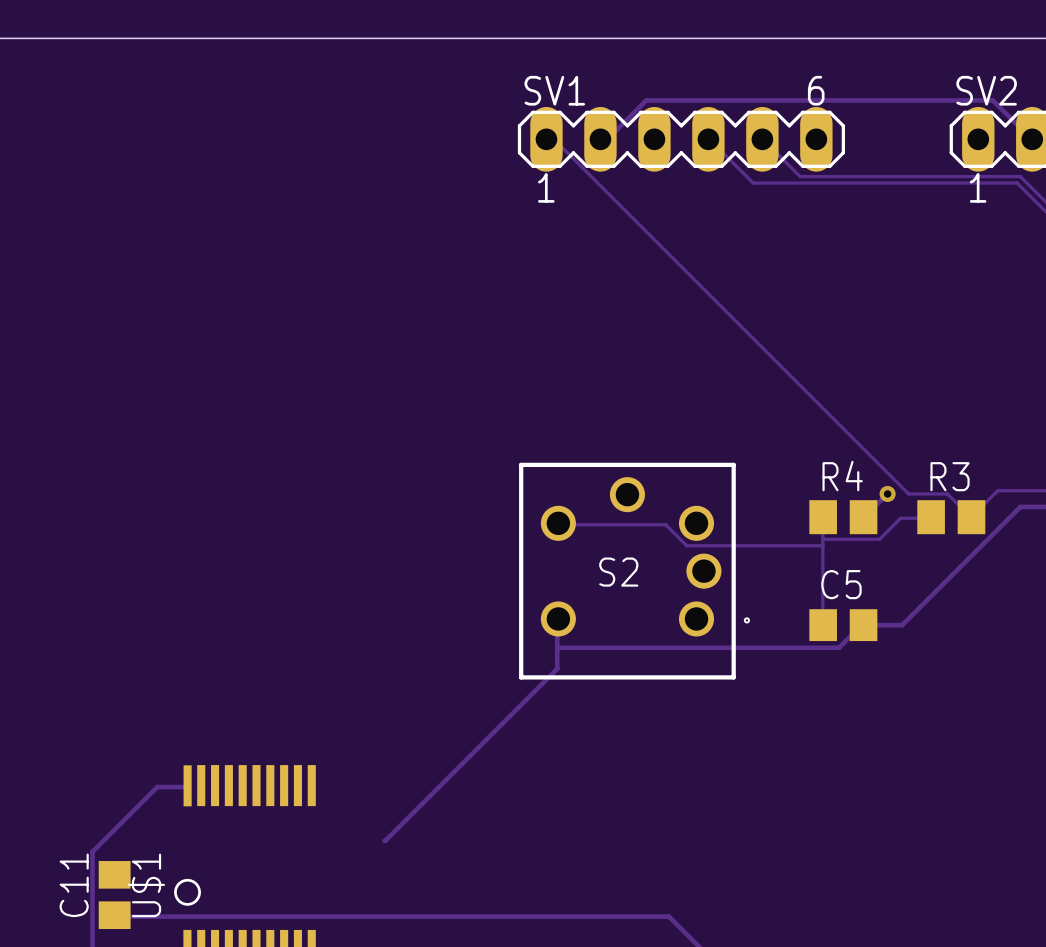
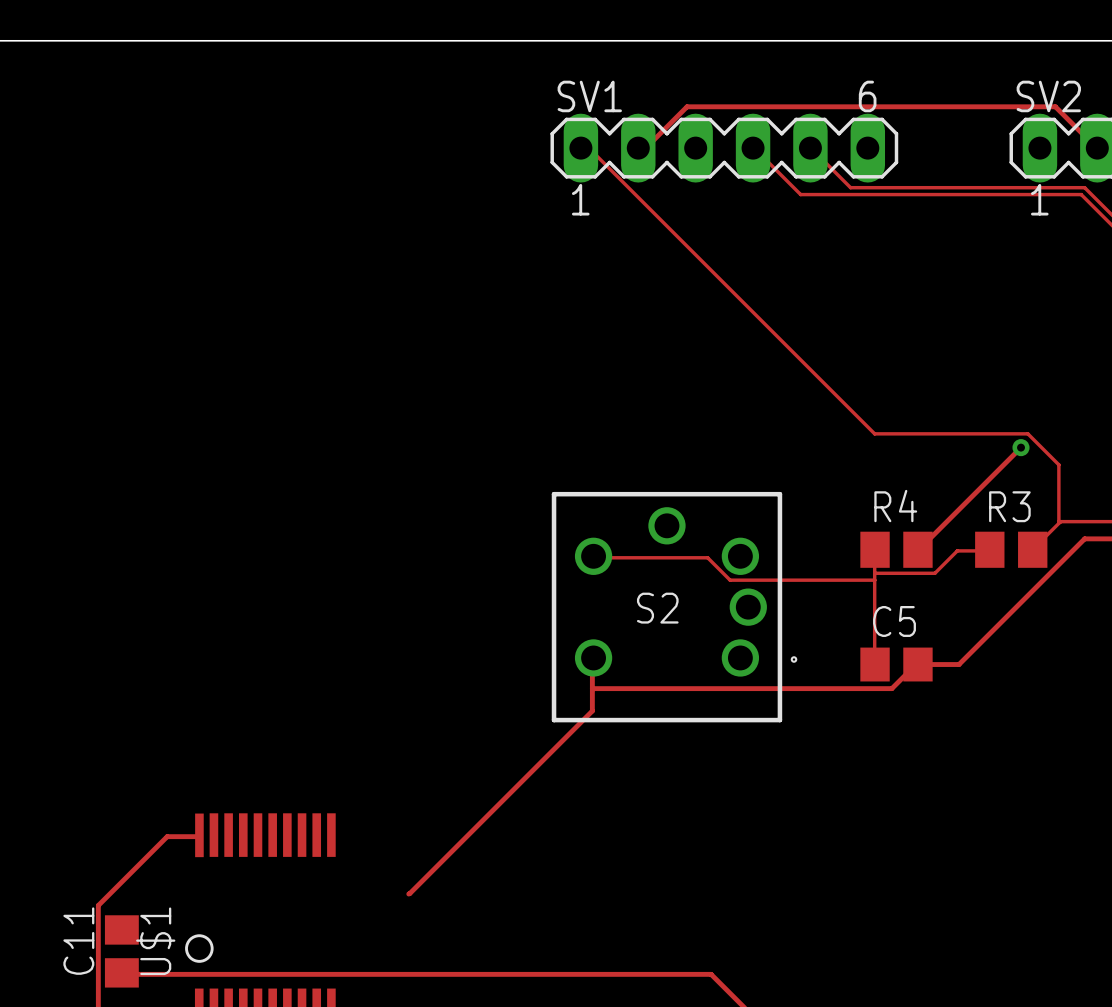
track: (822, 408) (908, 493) (947, 493) (971, 517) -> (874, 433) (1027, 433) (1058, 464) (1059, 522)
track: none -> (1021, 447) (943, 525)
via position: (887, 493) -> (1021, 447)

